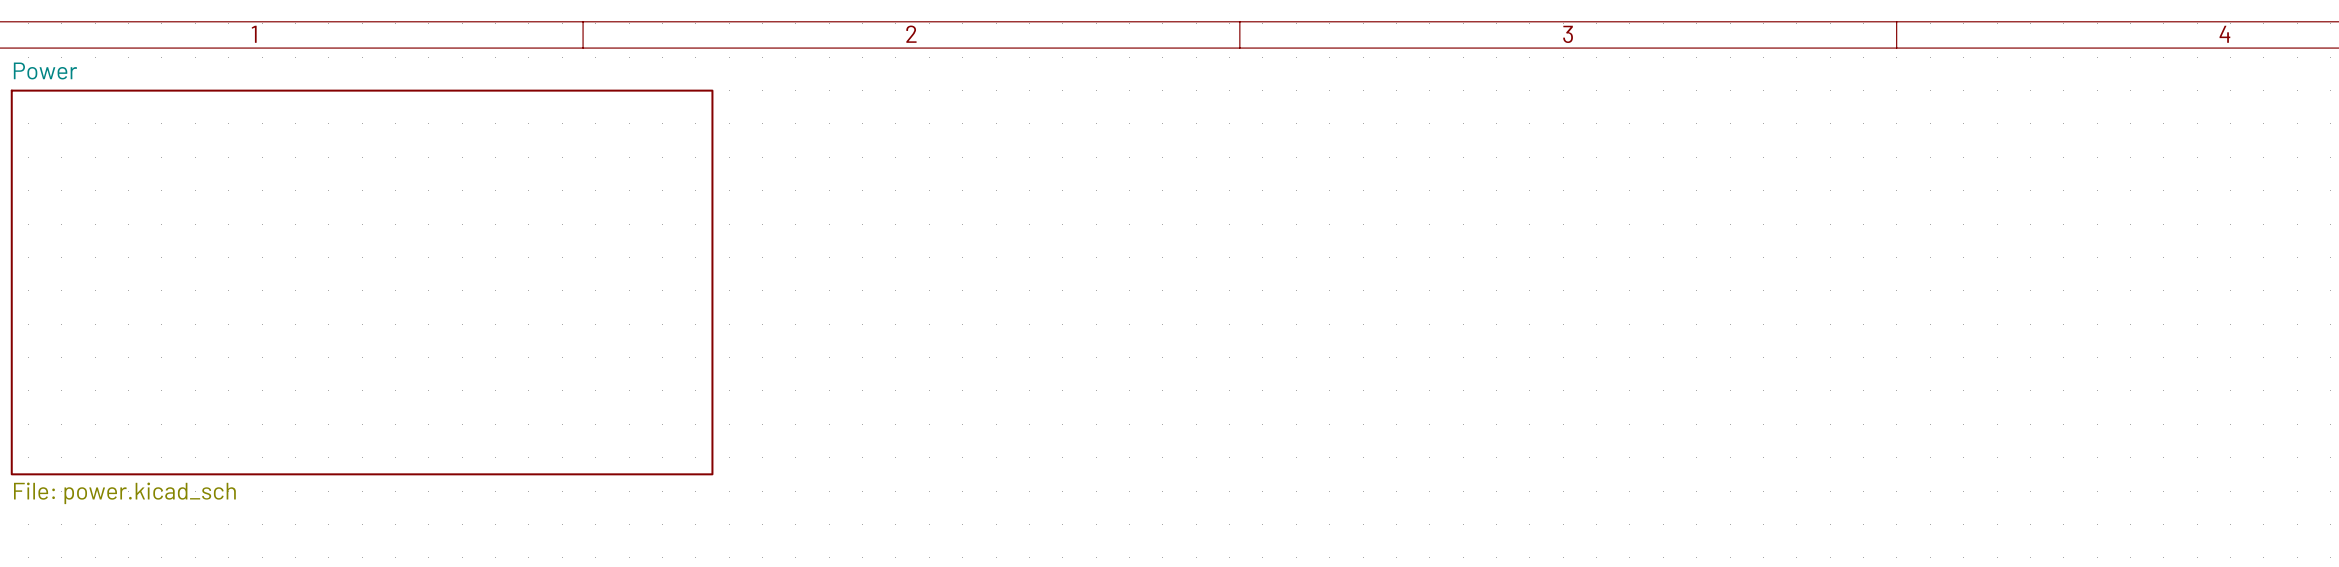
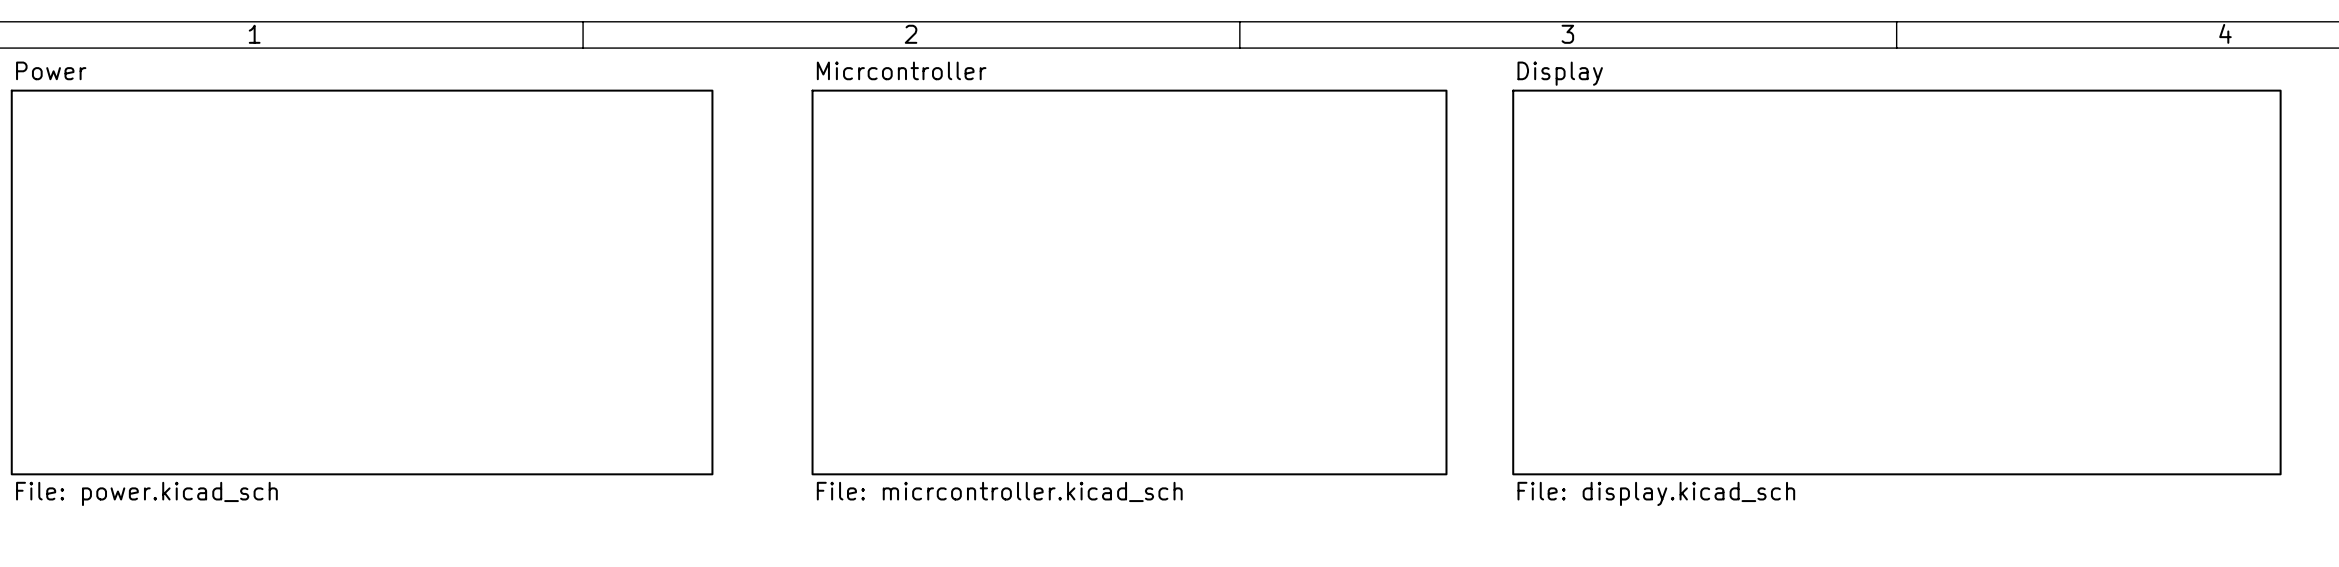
sheet Micrcontroller: none -> File: micrcontroller.kicad_sch (1129, 282)
sheet Display: none -> File: display.kicad_sch (1896, 282)

